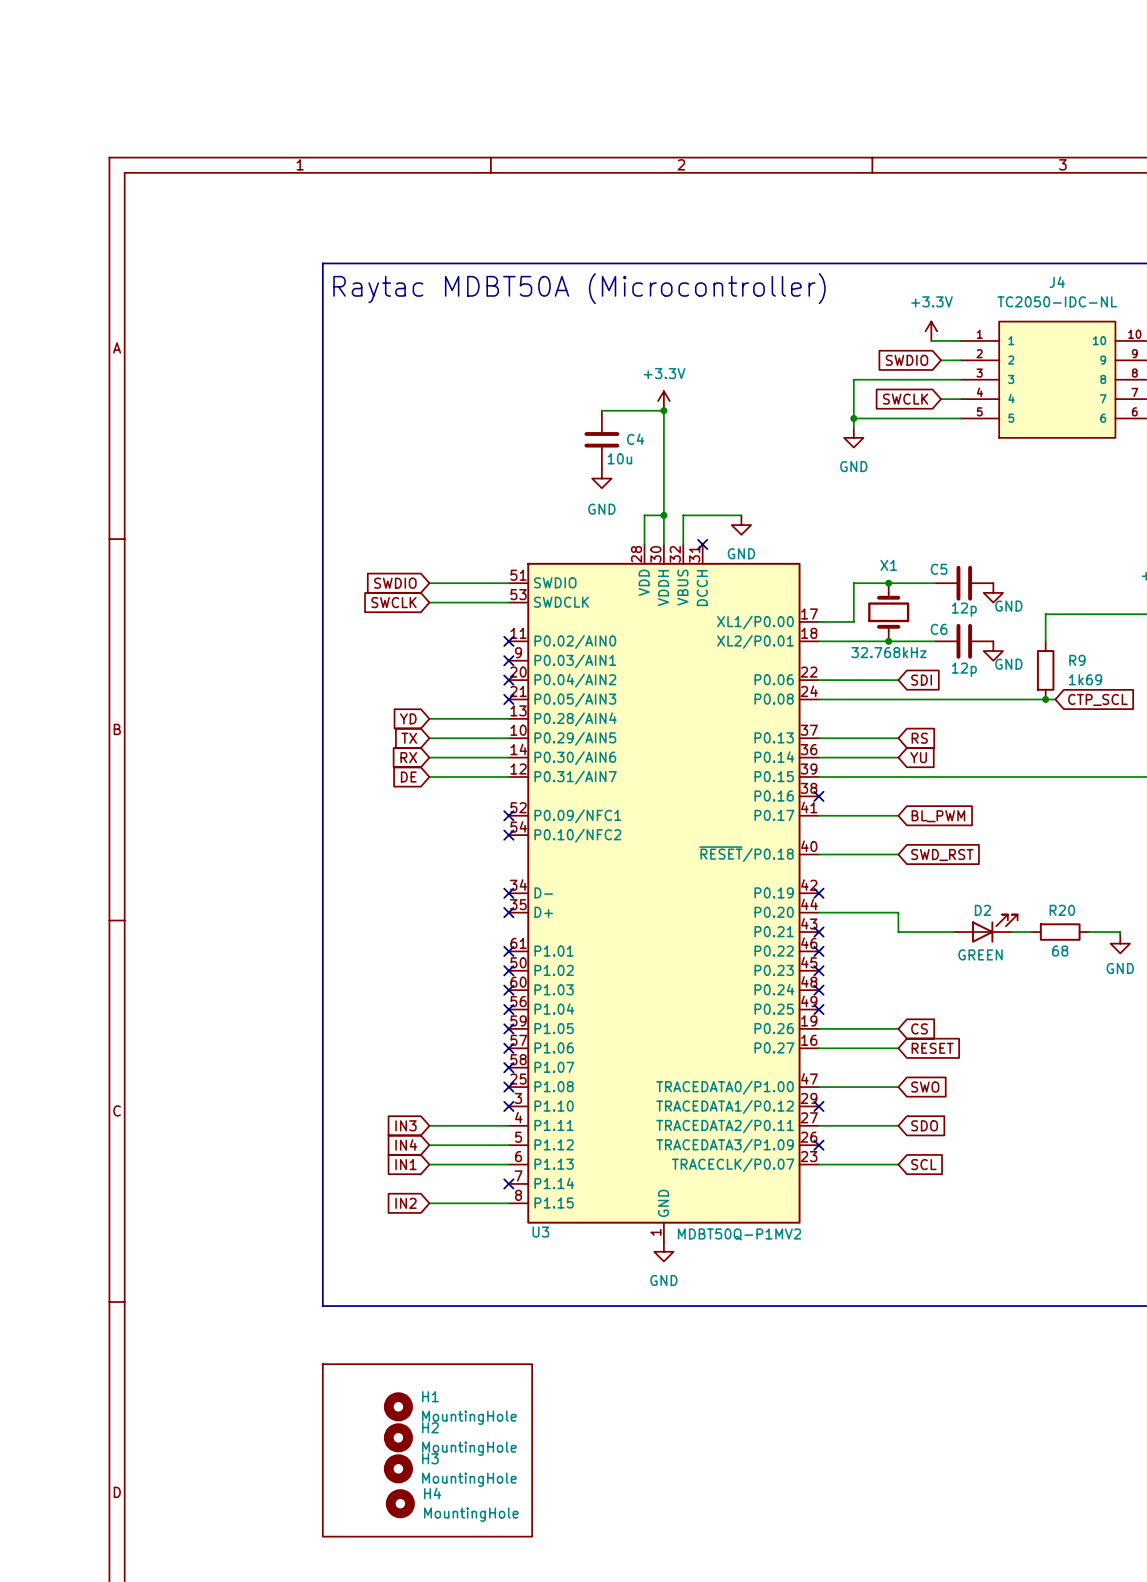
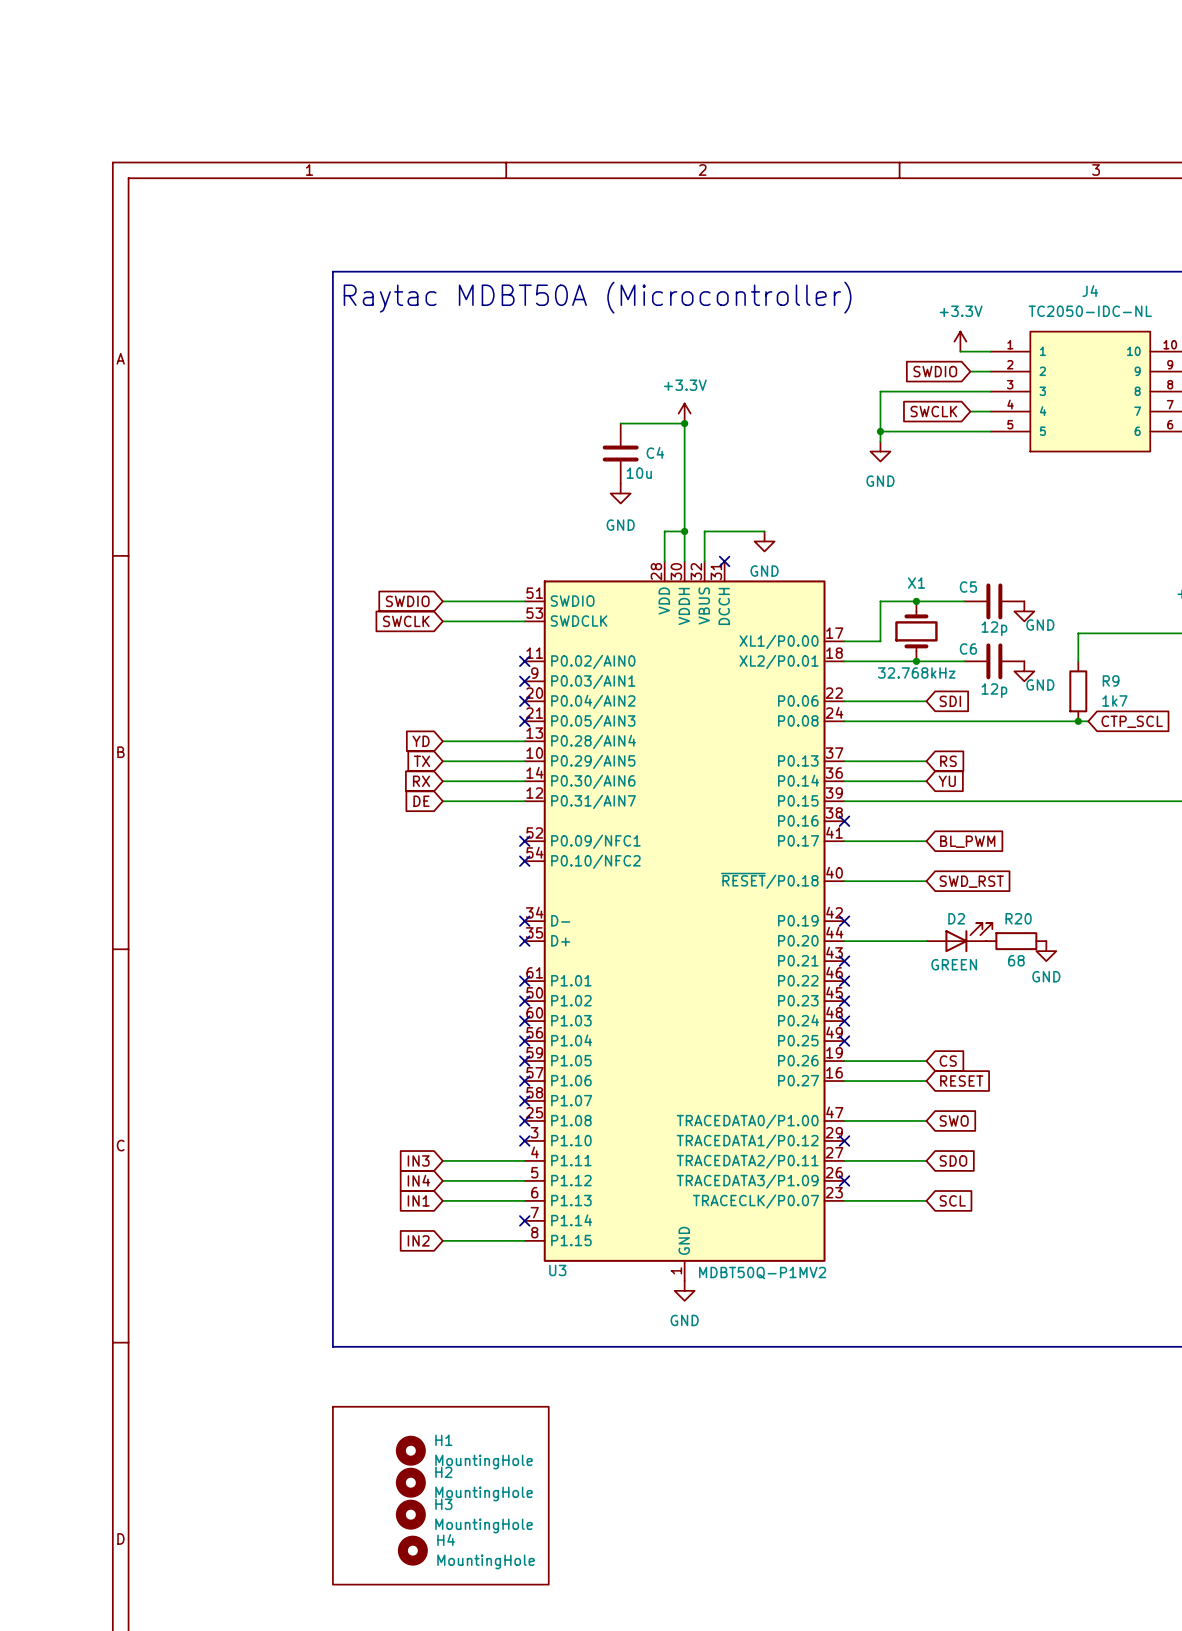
R9 value: 1k69 (1085, 679) -> 1k7 (1114, 700)
wire: (898, 912) (898, 932) (953, 932) -> none
D2 position: (985, 928) -> (959, 937)
wire: (1011, 932) (1031, 932) -> none
R20 position: (1060, 932) -> (1016, 941)
wire: (1089, 932) (1120, 932) (1120, 933) -> none
power symbol position: GND (1120, 943) -> GND (1046, 951)

